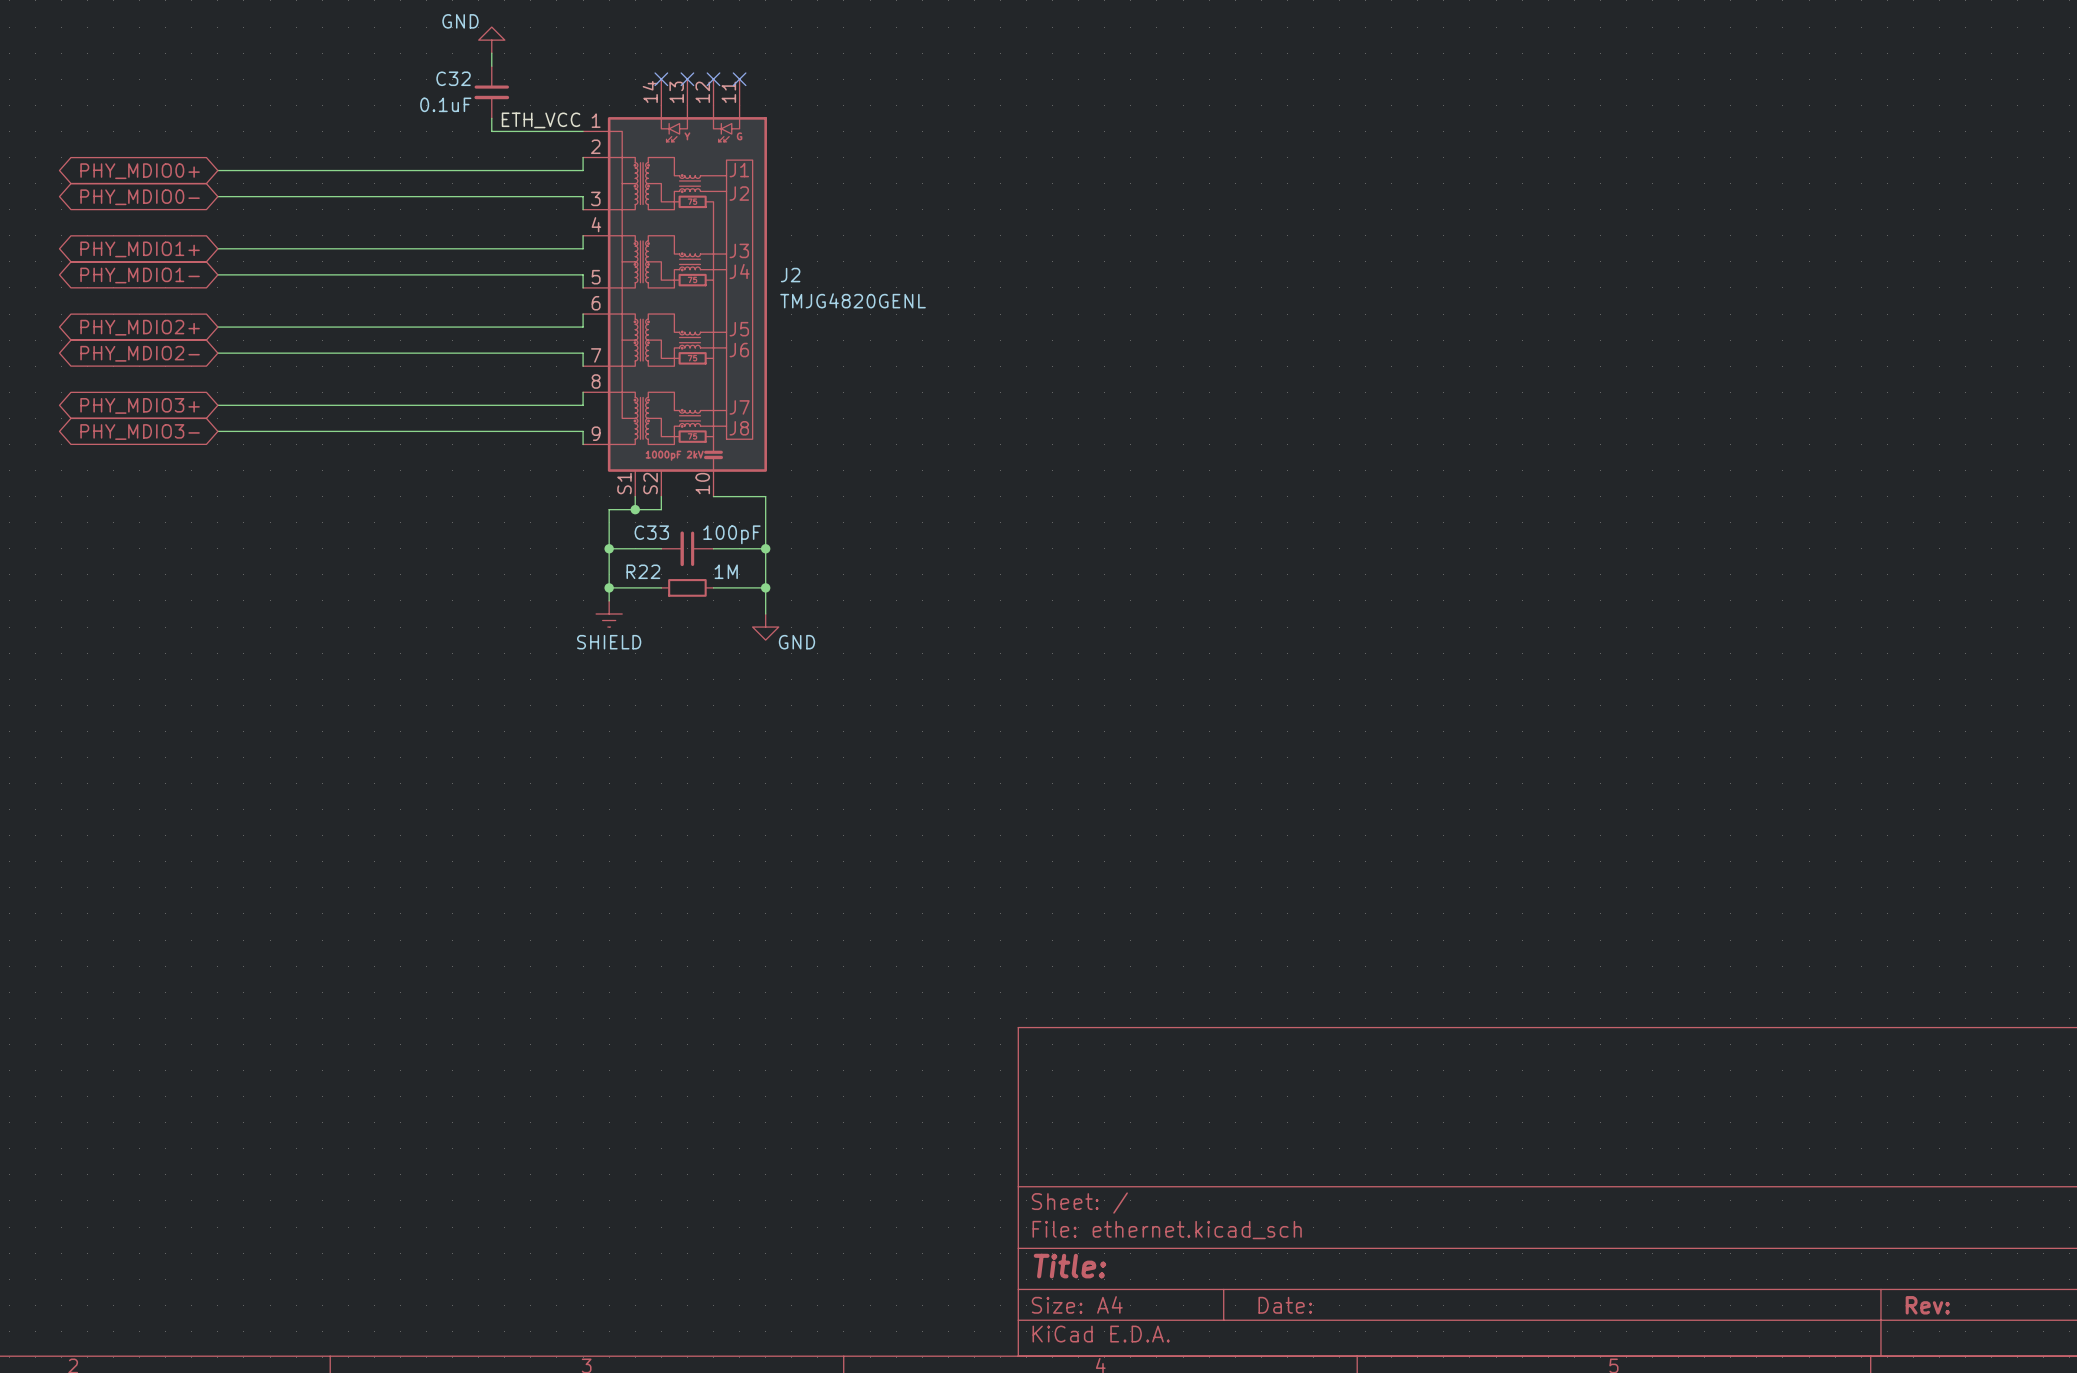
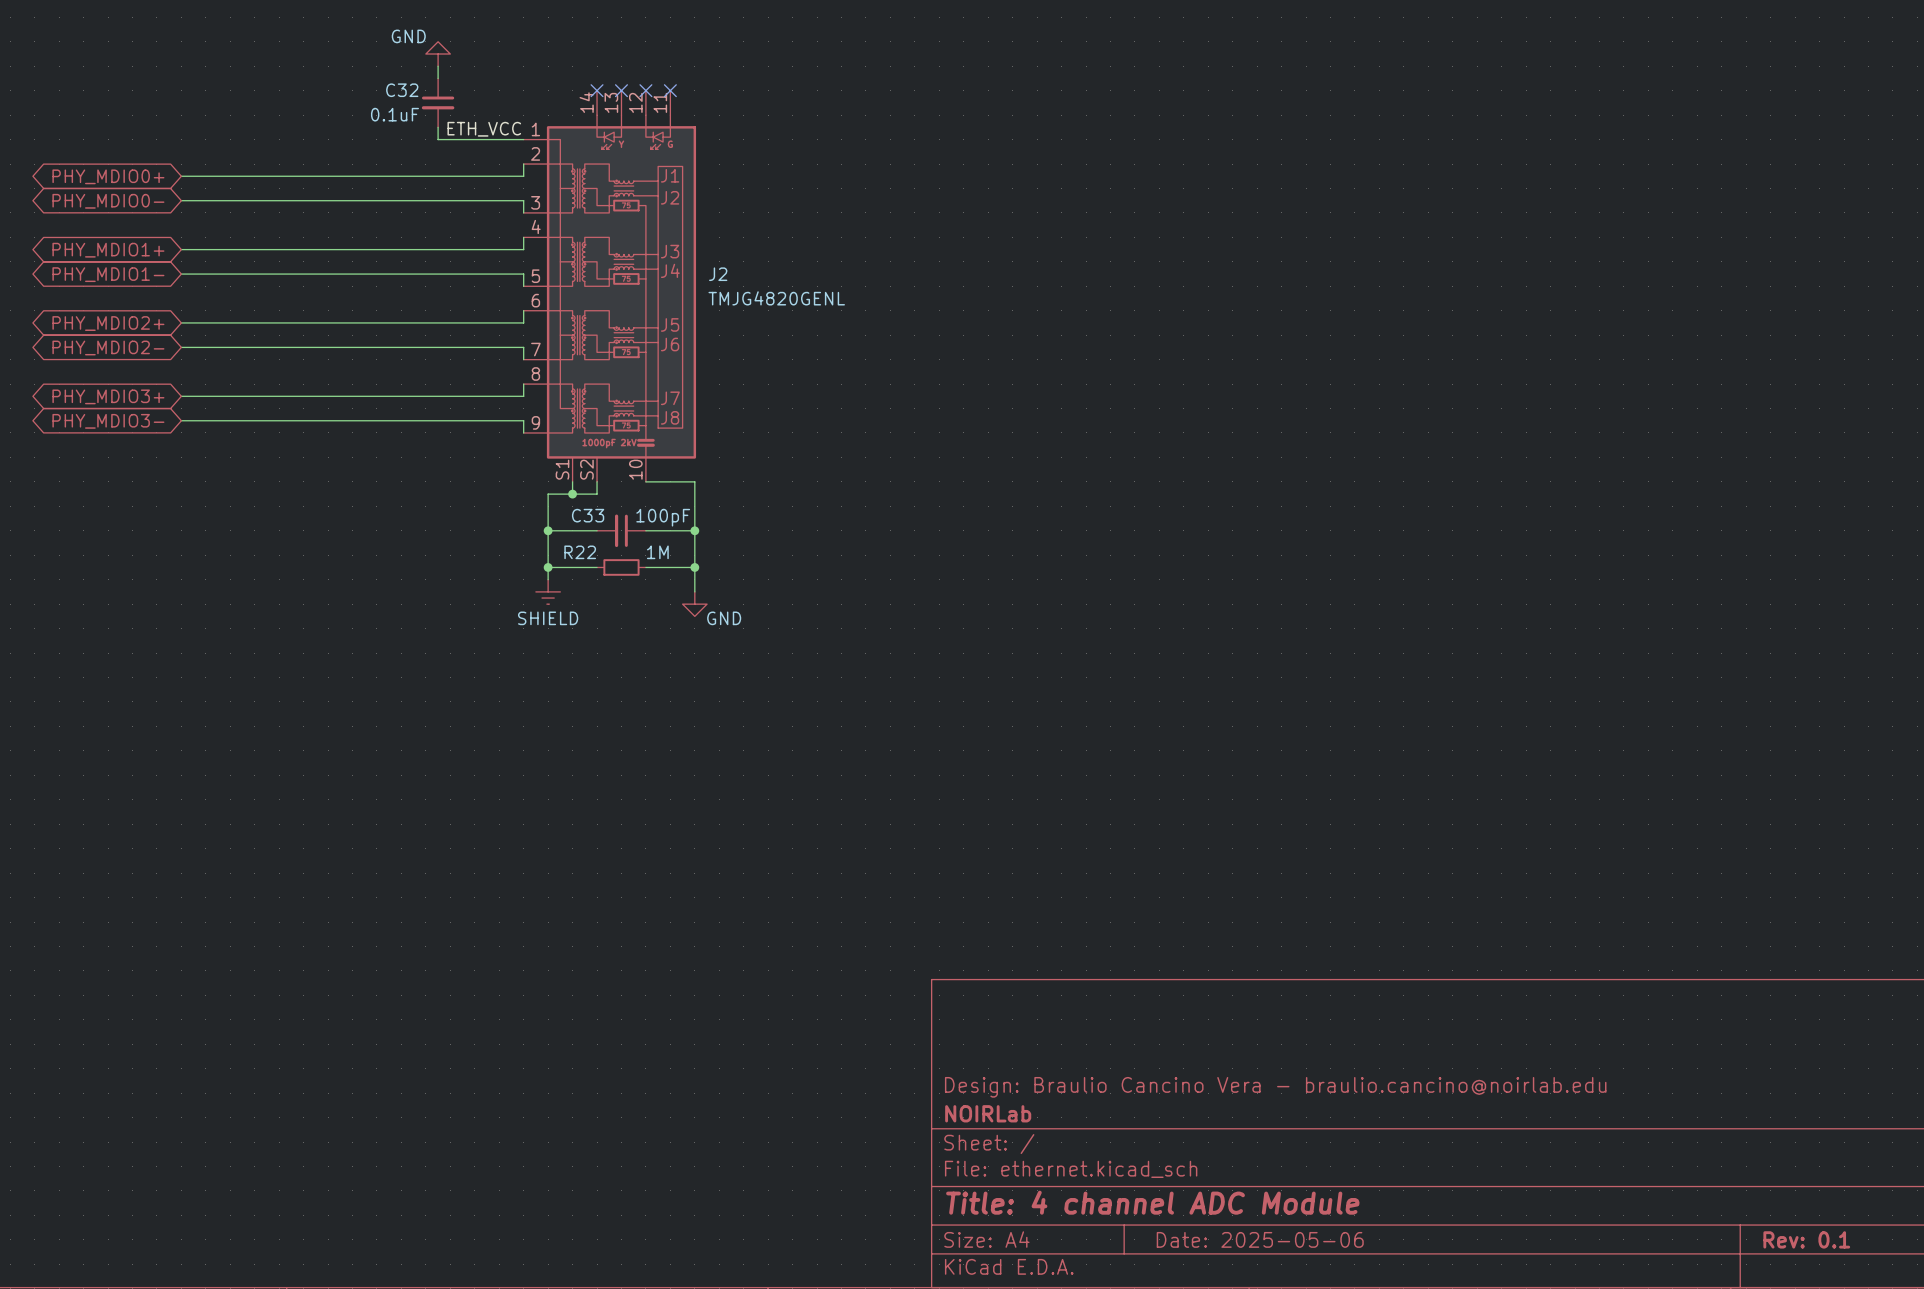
title block: none -> Design: Braulio Cancino Vera - braulio.cancino@noirlab.edu (1275, 1087)
title block: none -> NOIRLab (988, 1113)
title block: Title: (1069, 1266) -> Title: 4 channel ADC Module (1152, 1202)
title block: Date: (1285, 1305) -> Date: 2025-05-06 (1260, 1239)
title block: Rev: (1927, 1305) -> Rev: 0.1 (1806, 1239)

